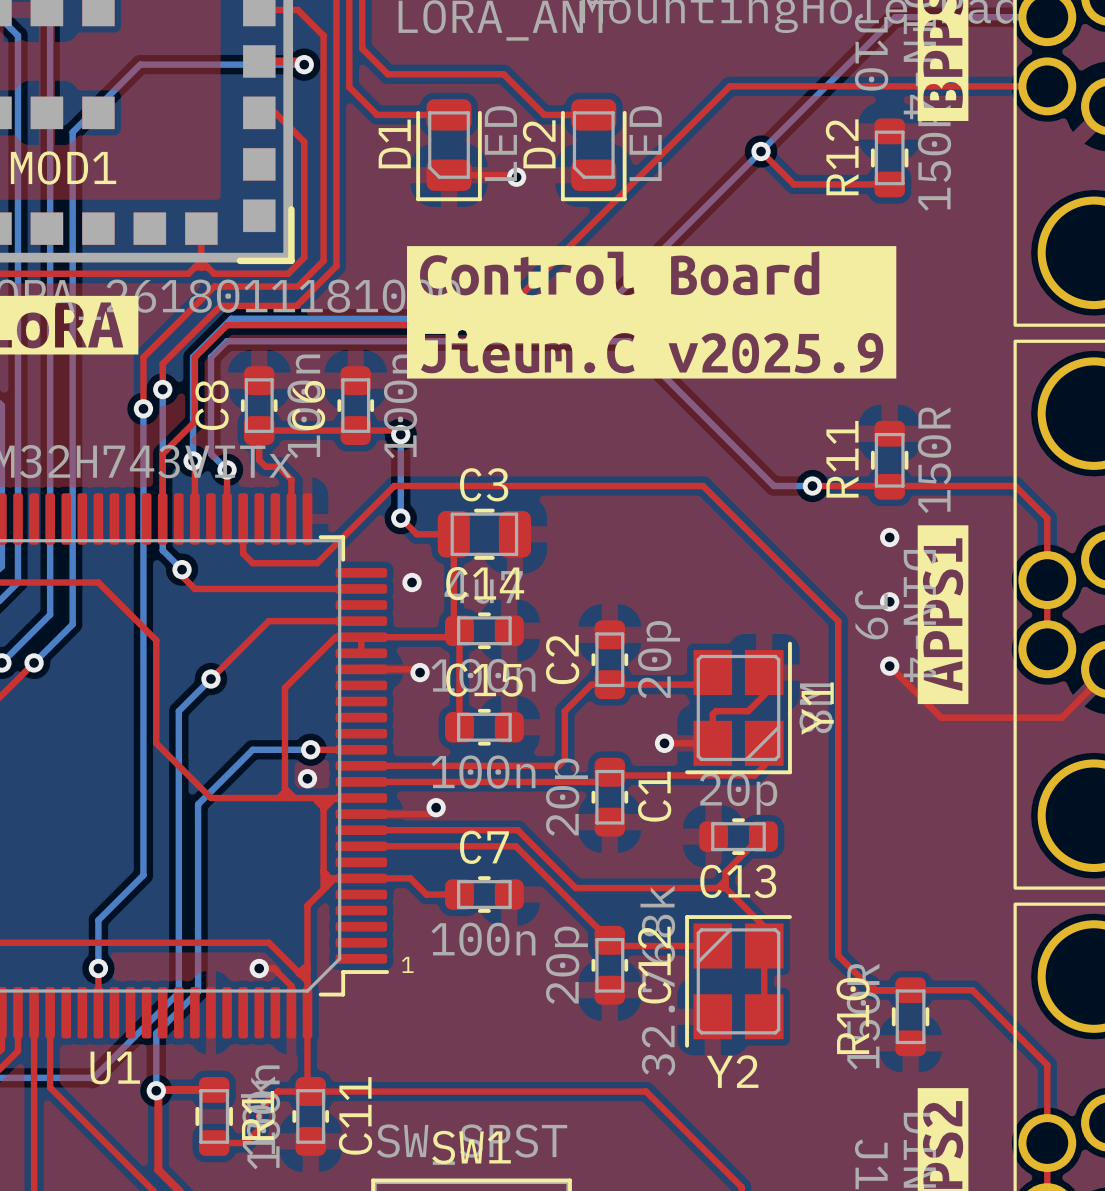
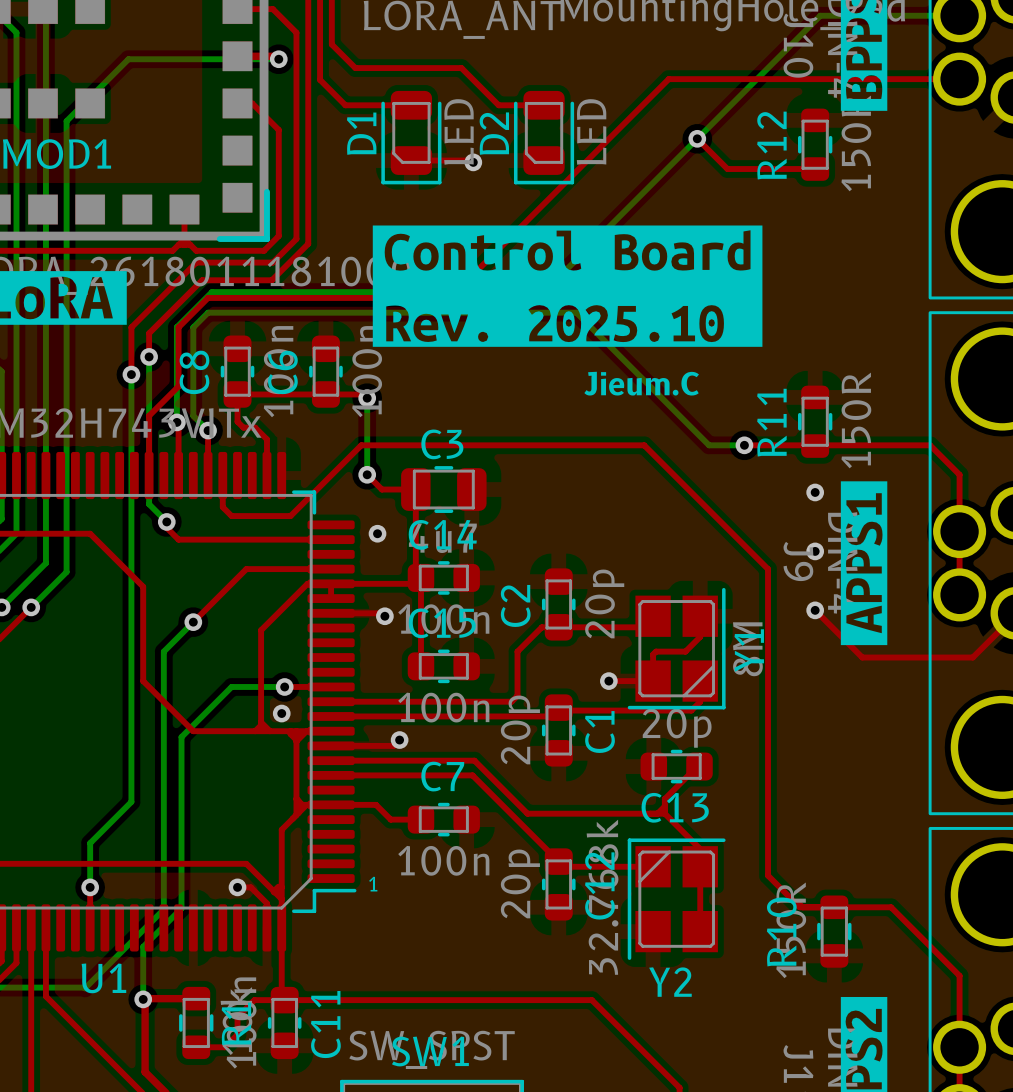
drawing shape: [407, 246, 897, 379] -> [372, 225, 763, 347]
text: none -> Jieum.C (641, 383)

